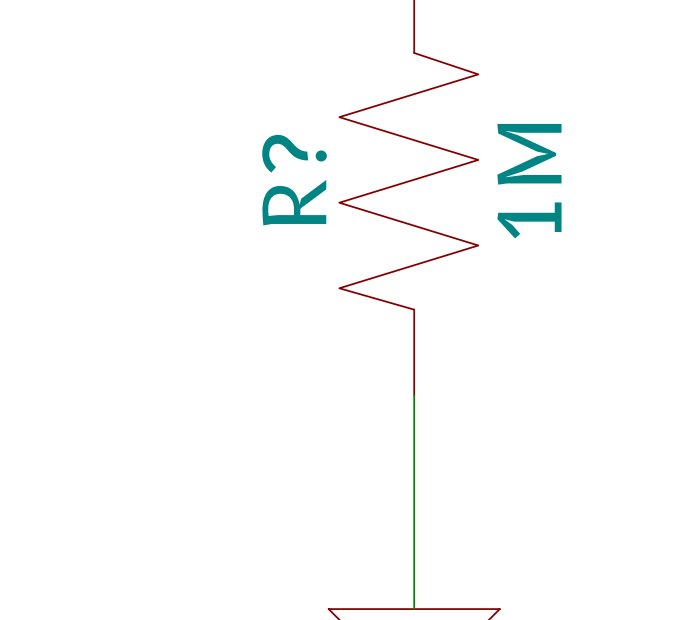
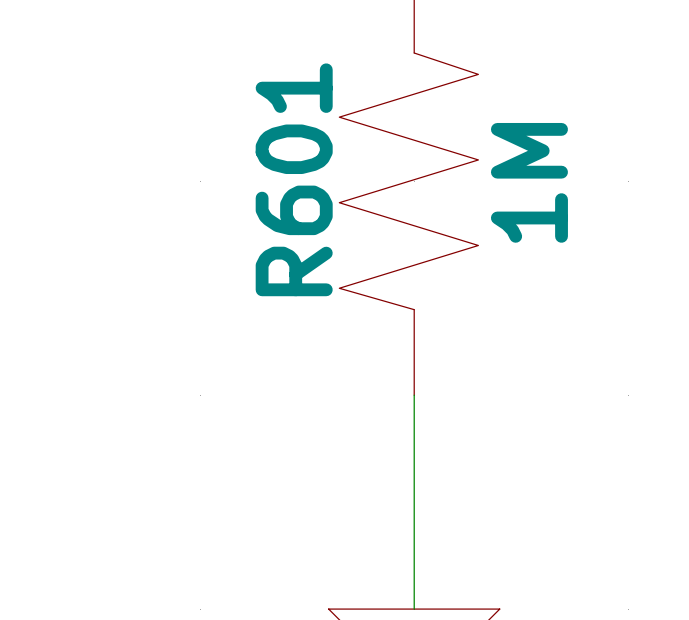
R? name: R? (294, 180) -> R601 (294, 179)

